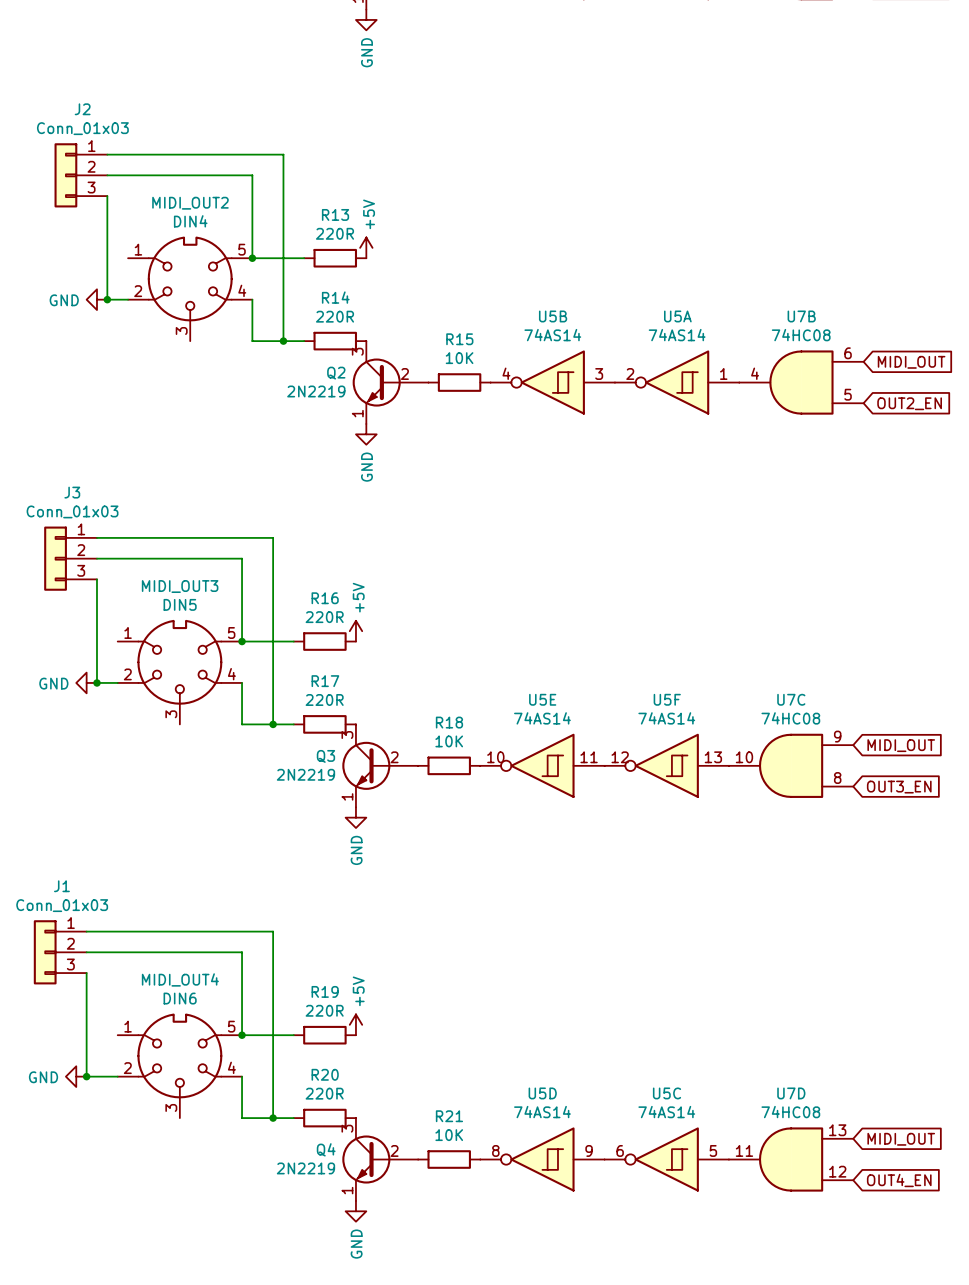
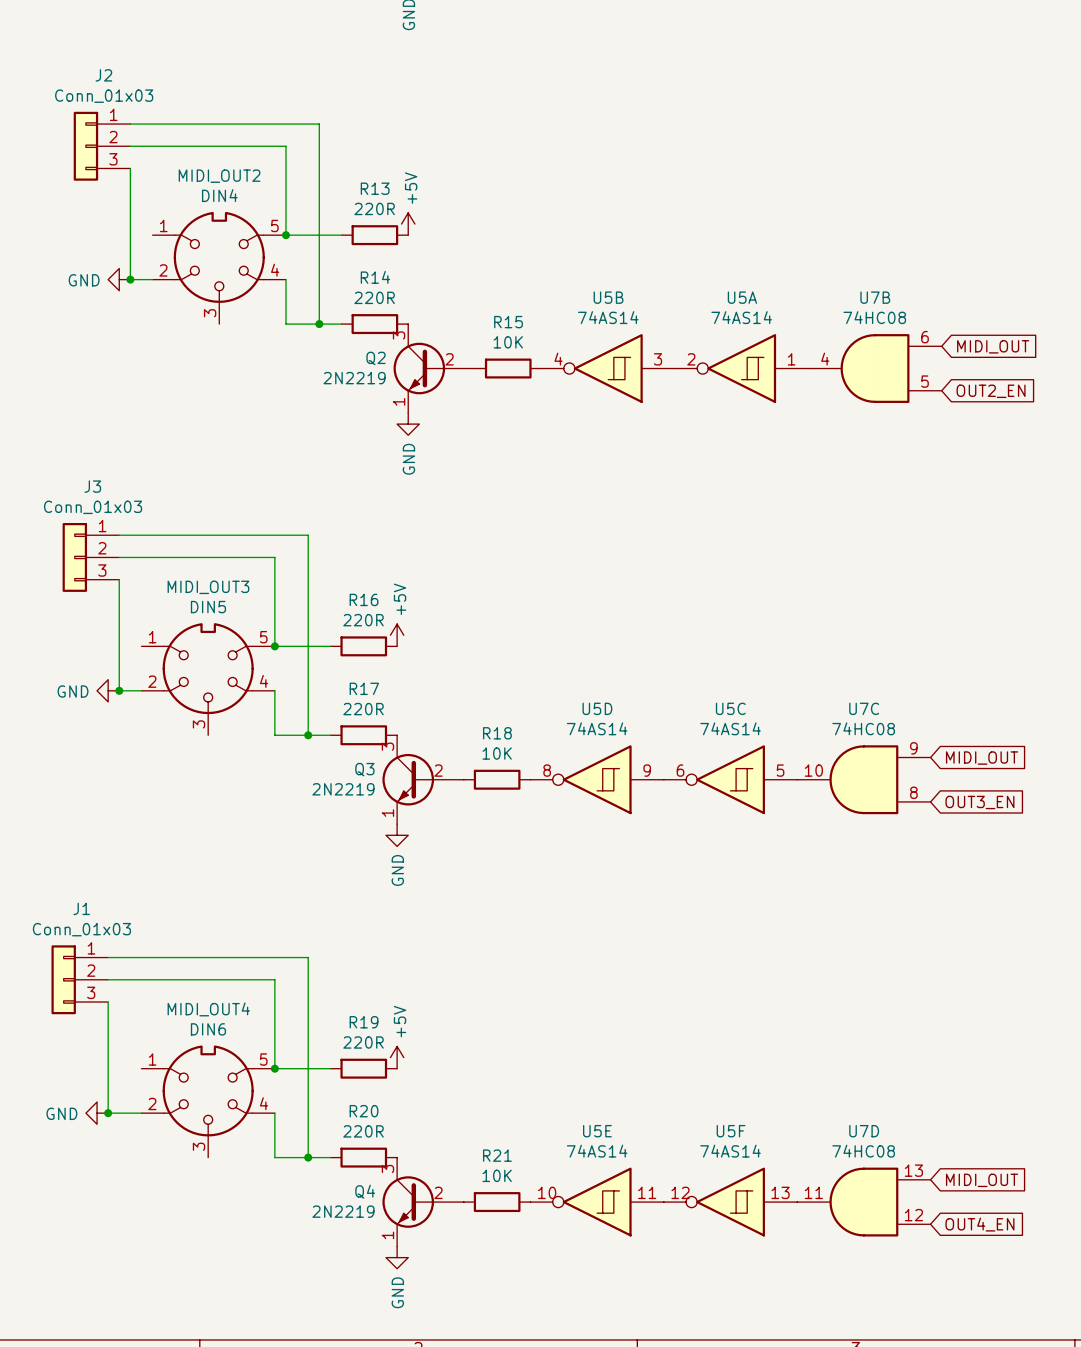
U5E position: (542, 765) -> (597, 1202)
U5F position: (666, 765) -> (730, 1202)
U5D position: (542, 1159) -> (597, 779)
U5C position: (666, 1159) -> (730, 779)

